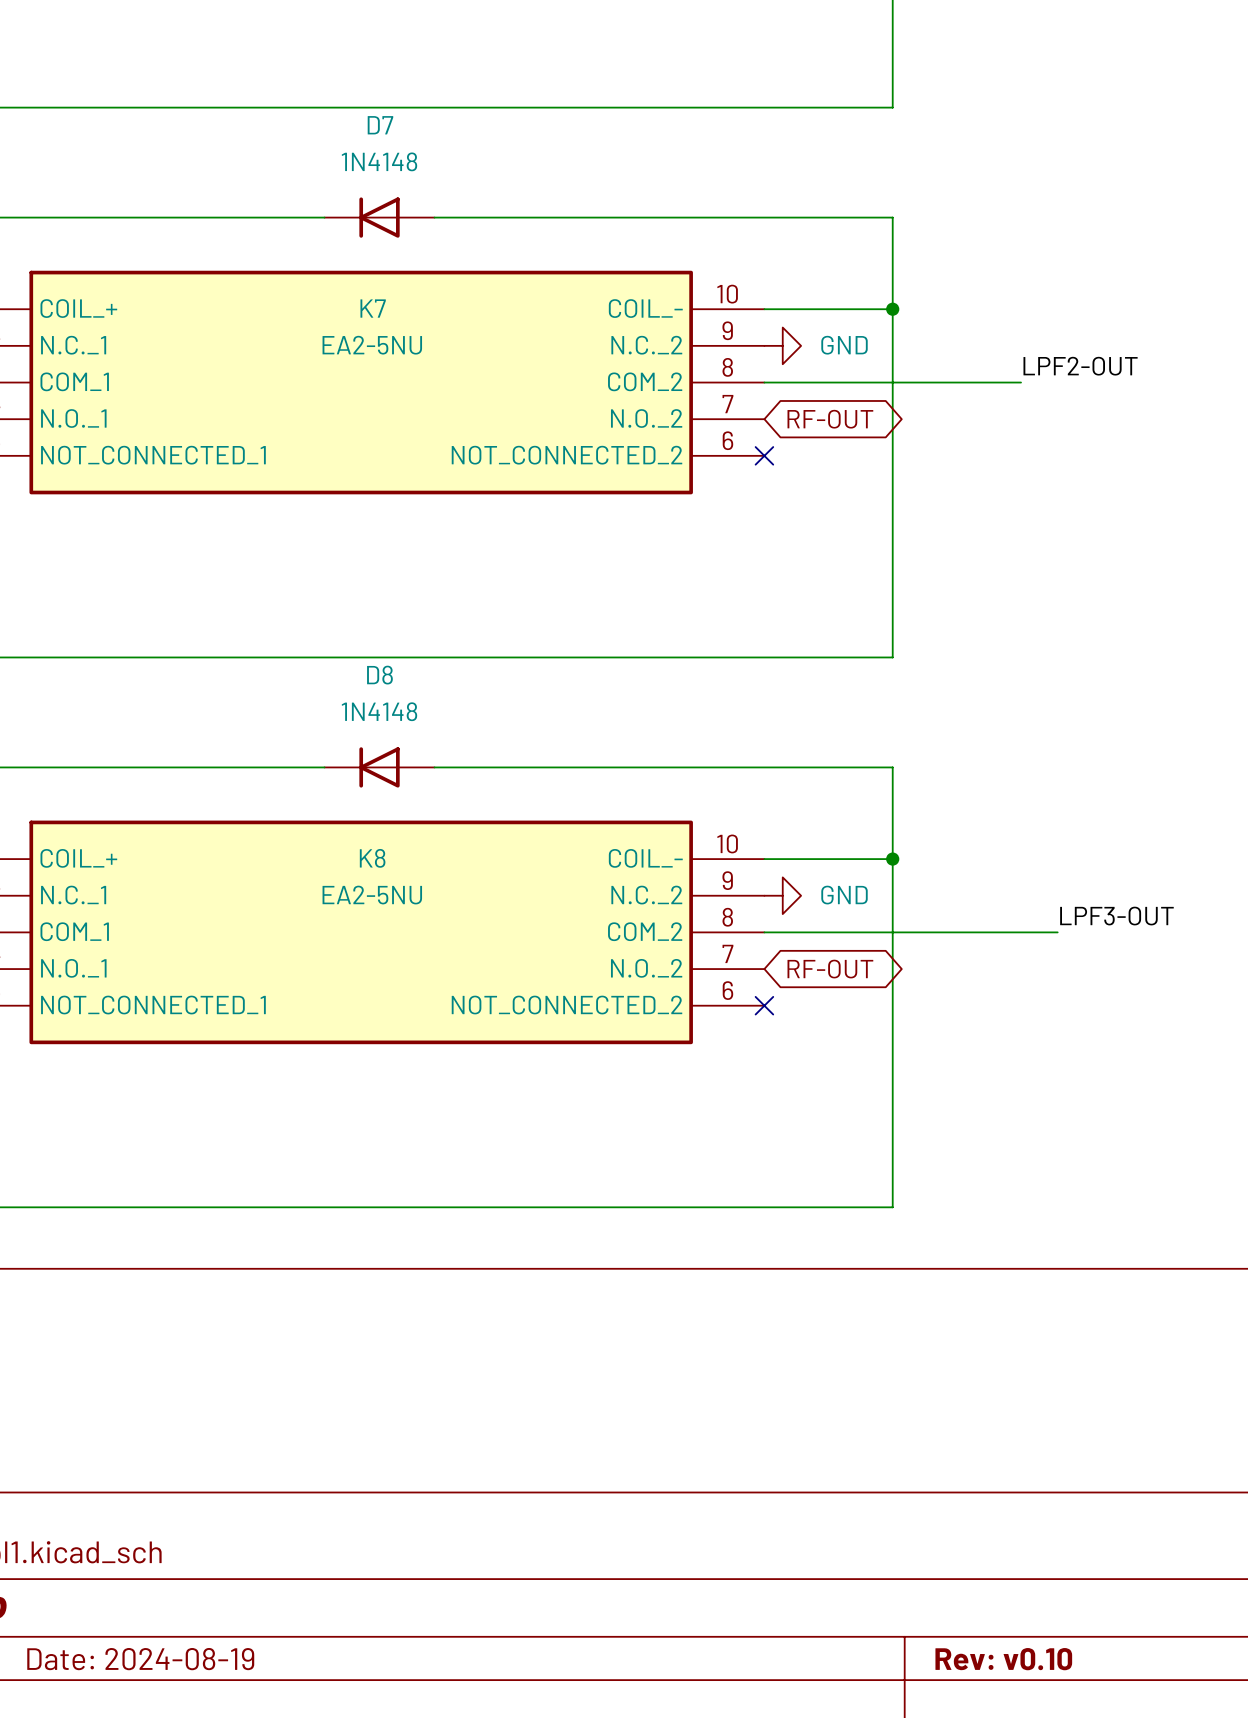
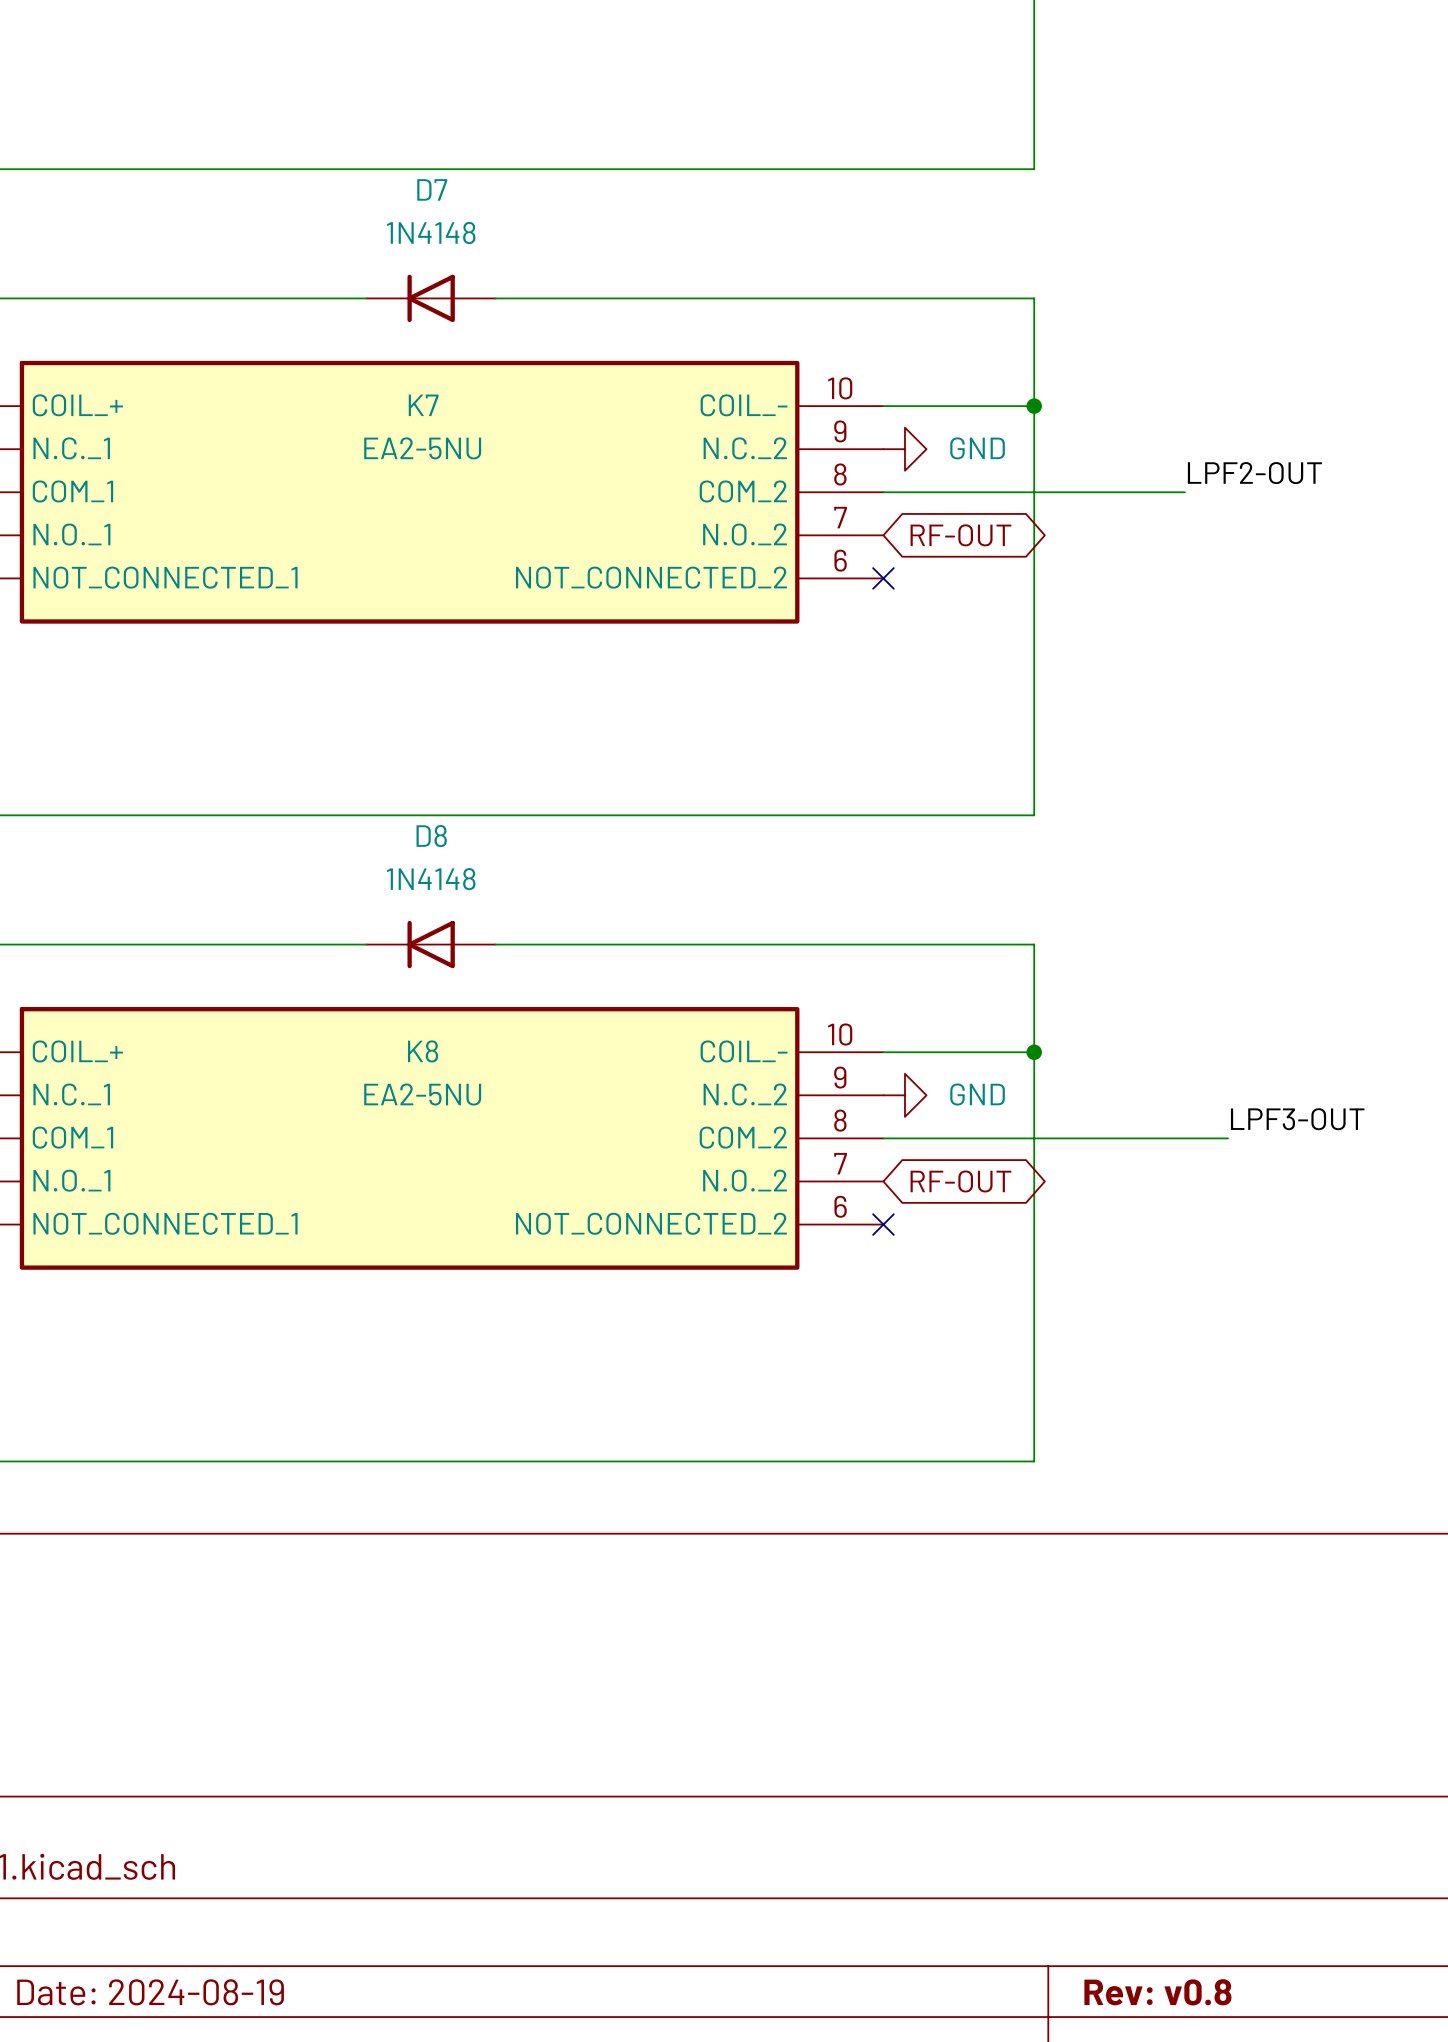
title block: Rev: v0.10 (1003, 1659) -> Rev: v0.8 (1157, 1992)

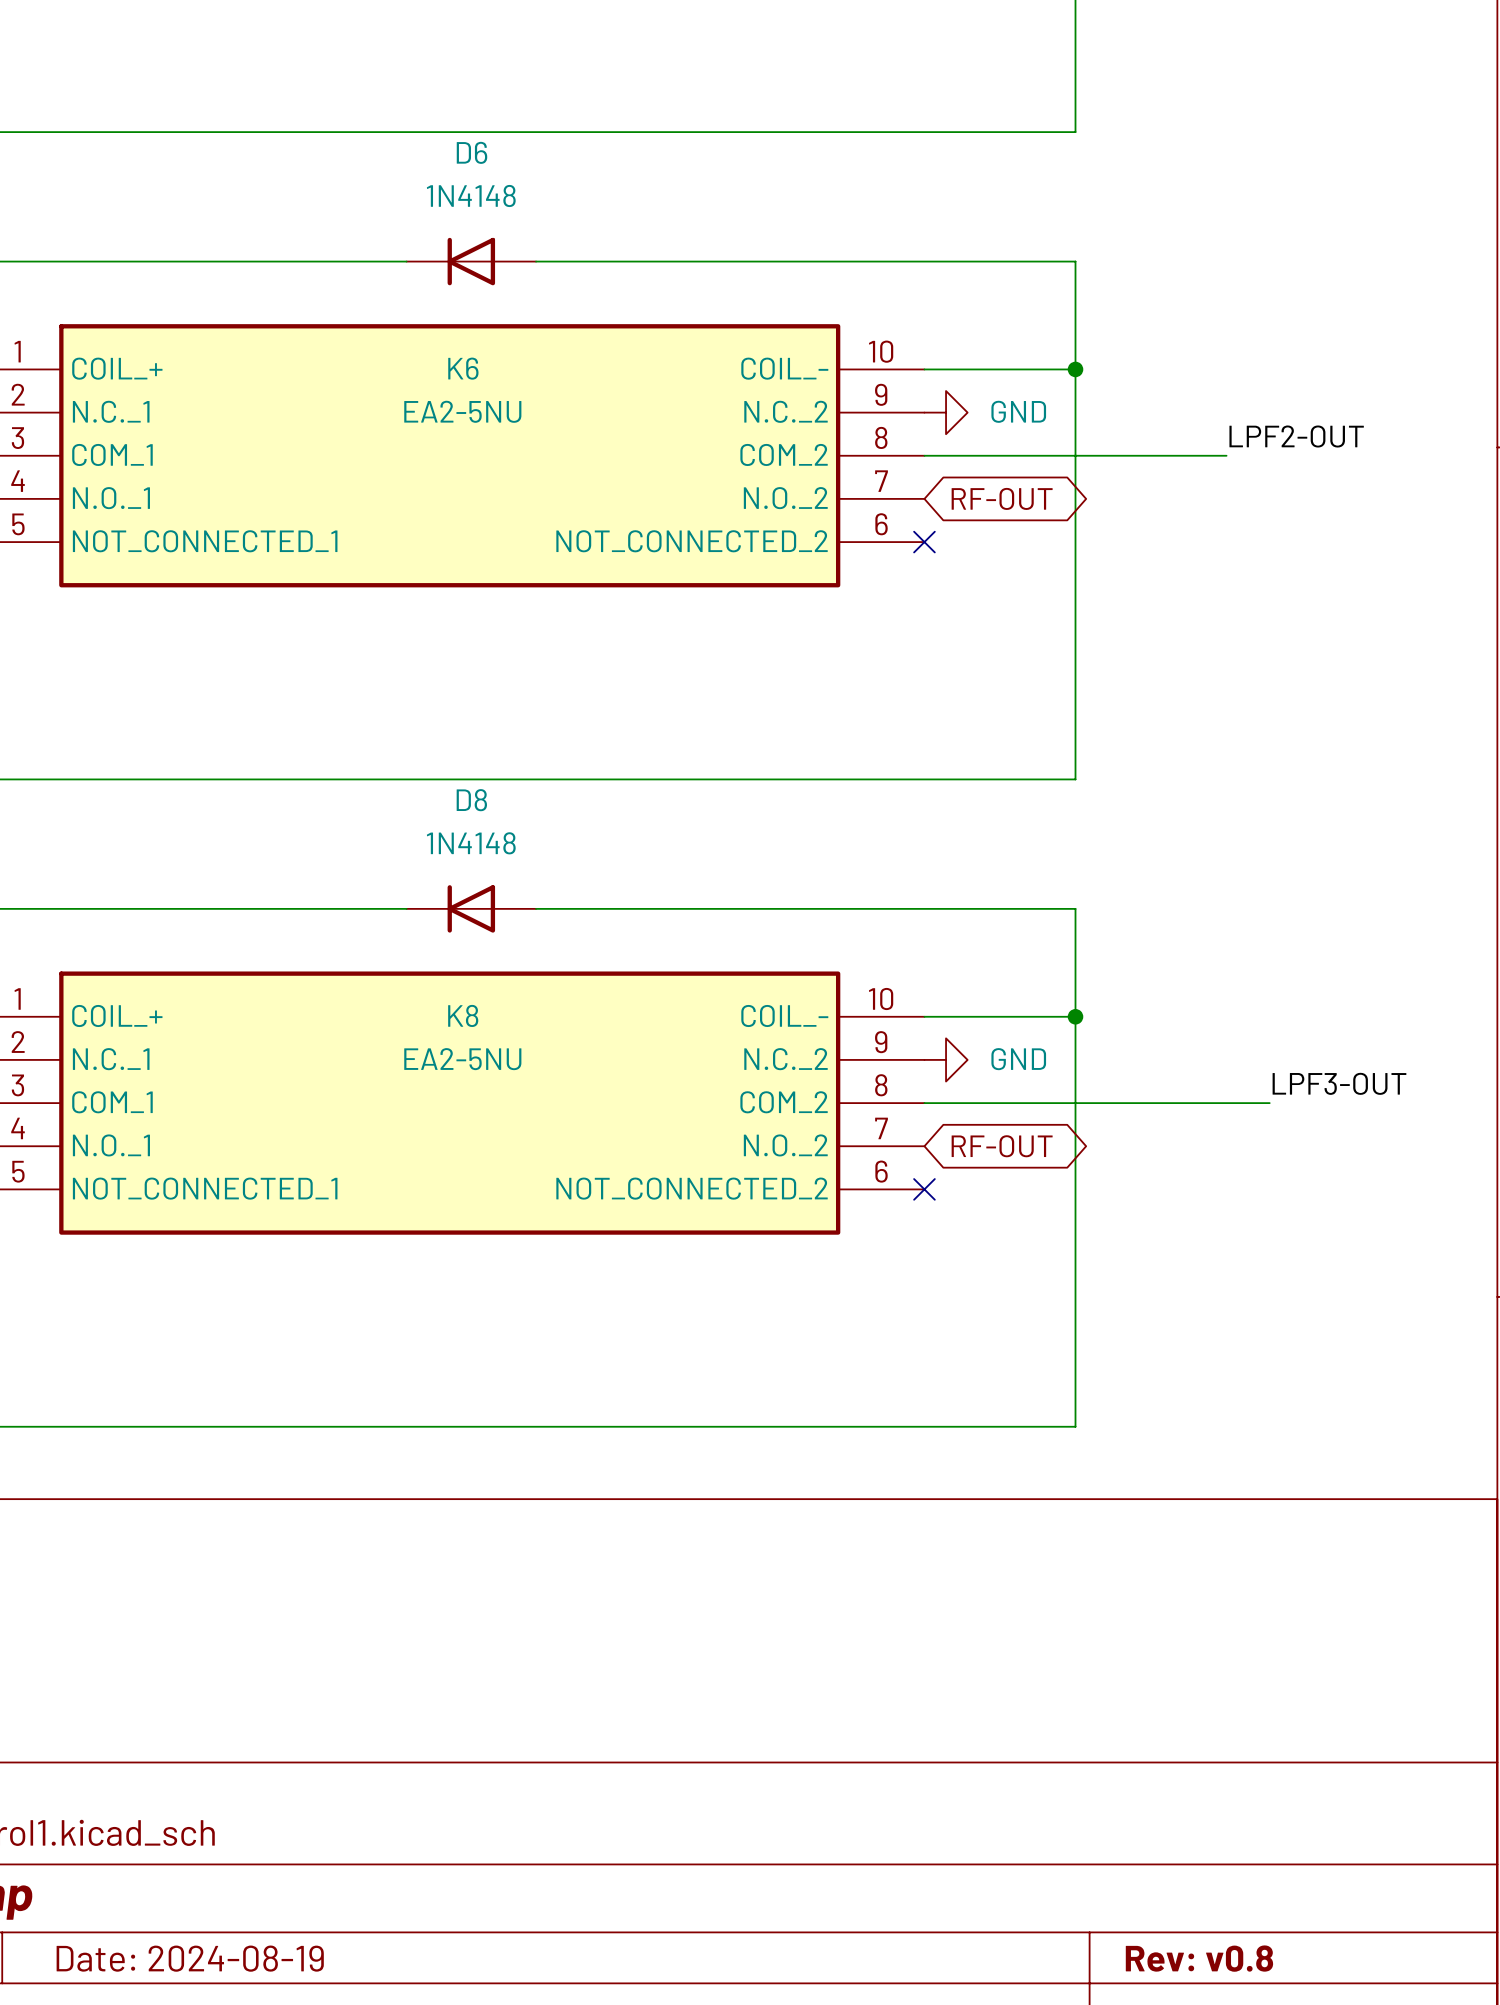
D7 name: D7 (432, 189) -> D6 (472, 152)
K7 name: K7 (423, 405) -> K6 (463, 368)

